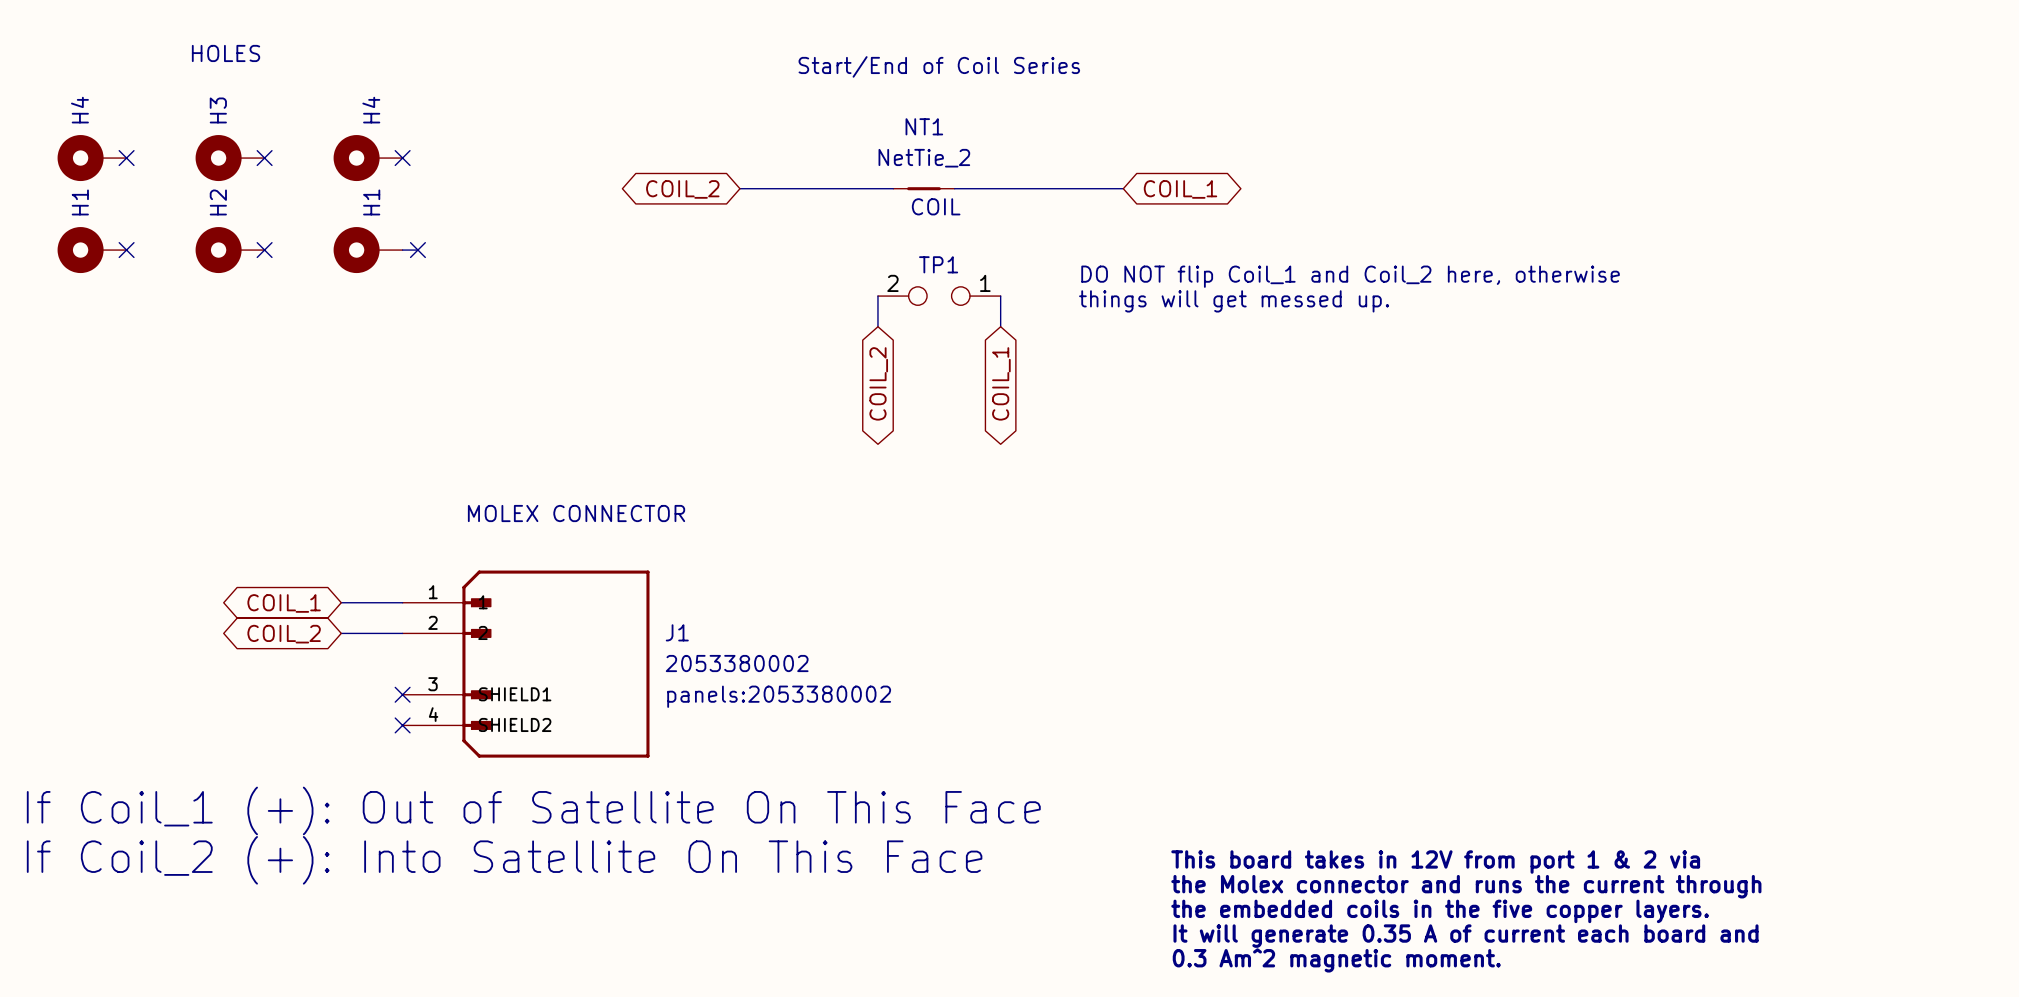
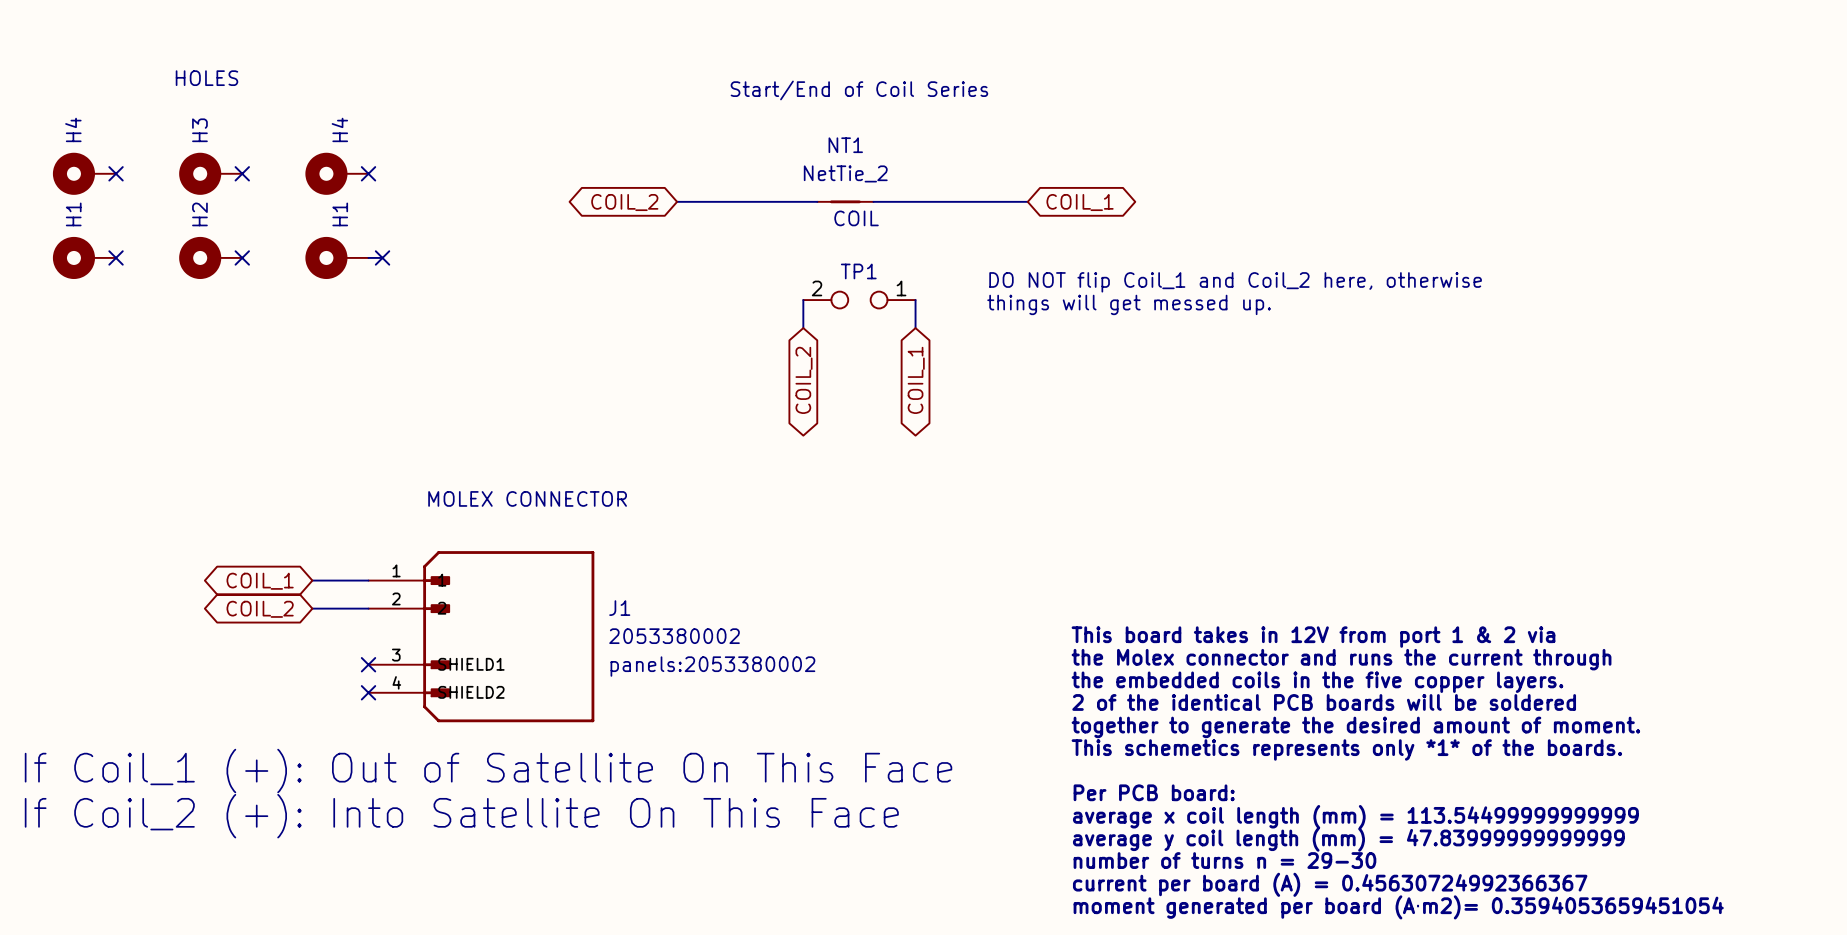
text: none -> This board takes in 12V from port 1 & 2 via (1313, 637)
text: none -> the Molex connector and runs the current through (1341, 659)
text: none -> the embedded coils in the five copper layers. (1317, 682)
text: none -> 2 of the identical PCB boards will be soldered (1324, 702)
text: none -> together to generate the desired amount of moment. (1355, 727)
text: none -> This schemetics represents only *1* of the boards. (1346, 749)
text: none -> Per PCB board: (1154, 792)
text: This board takes in 12V from port 1 & 2 via (1435, 862) -> average x coil length (mm) = 113.54499999999999 (1355, 817)
text: the Molex connector and runs the current through (1466, 886) -> average y coil length (mm) = 47.83999999999999 (1348, 839)
text: the embedded coils in the five copper layers. (1440, 911) -> number of turns n = 29-30 (1224, 860)
text: It will generate 0.35 A of current each board and (1466, 936) -> current per board (A) = 0.45630724992366367 (1330, 884)
text: 0.3 Am^2 magnetic moment. (1336, 960) -> moment generated per board (A⋅m2)= 0.3594053659451054 (1398, 907)

